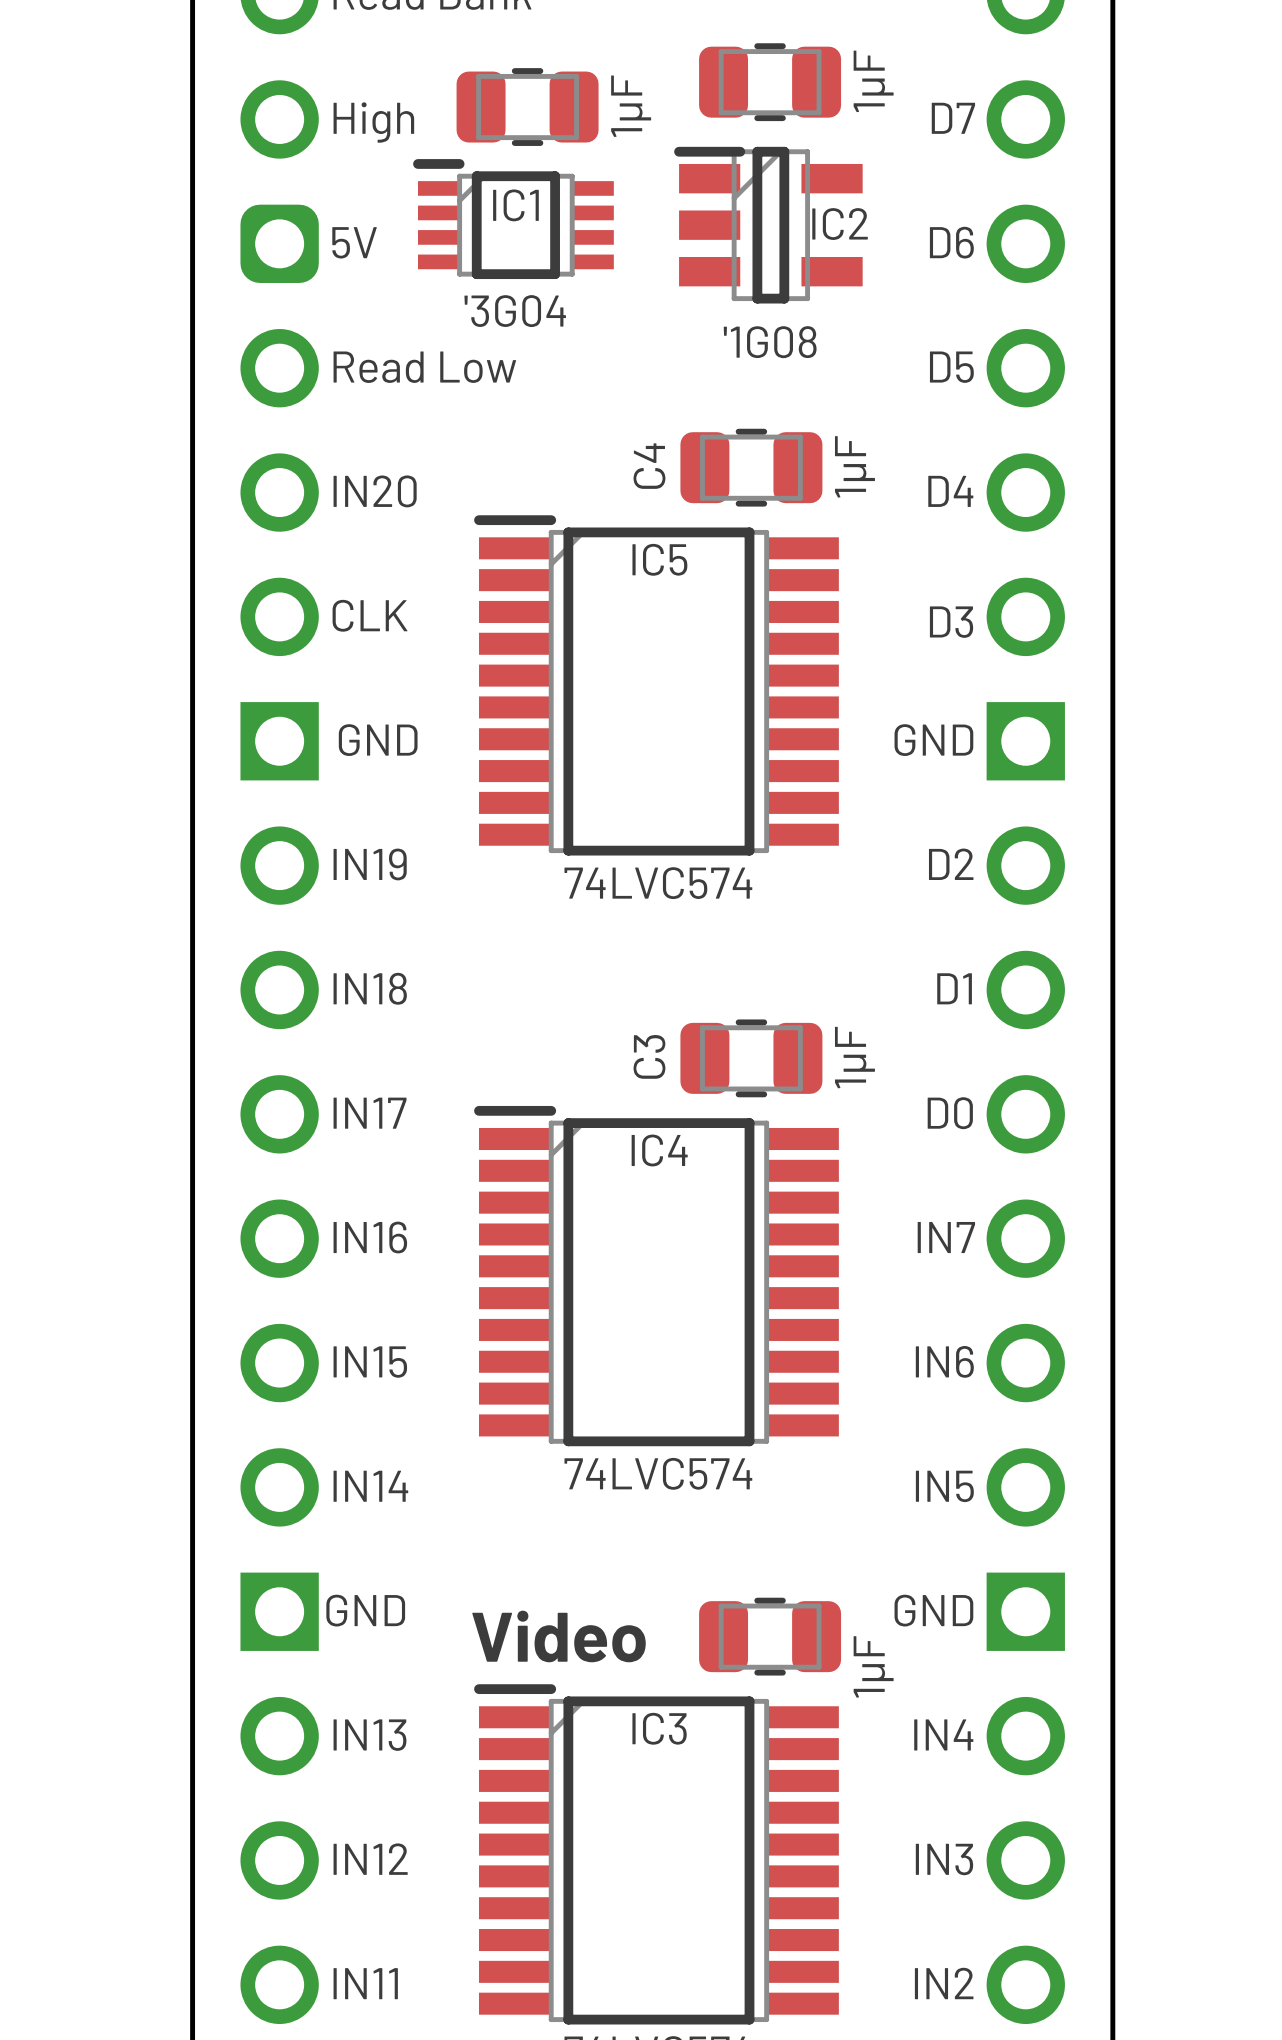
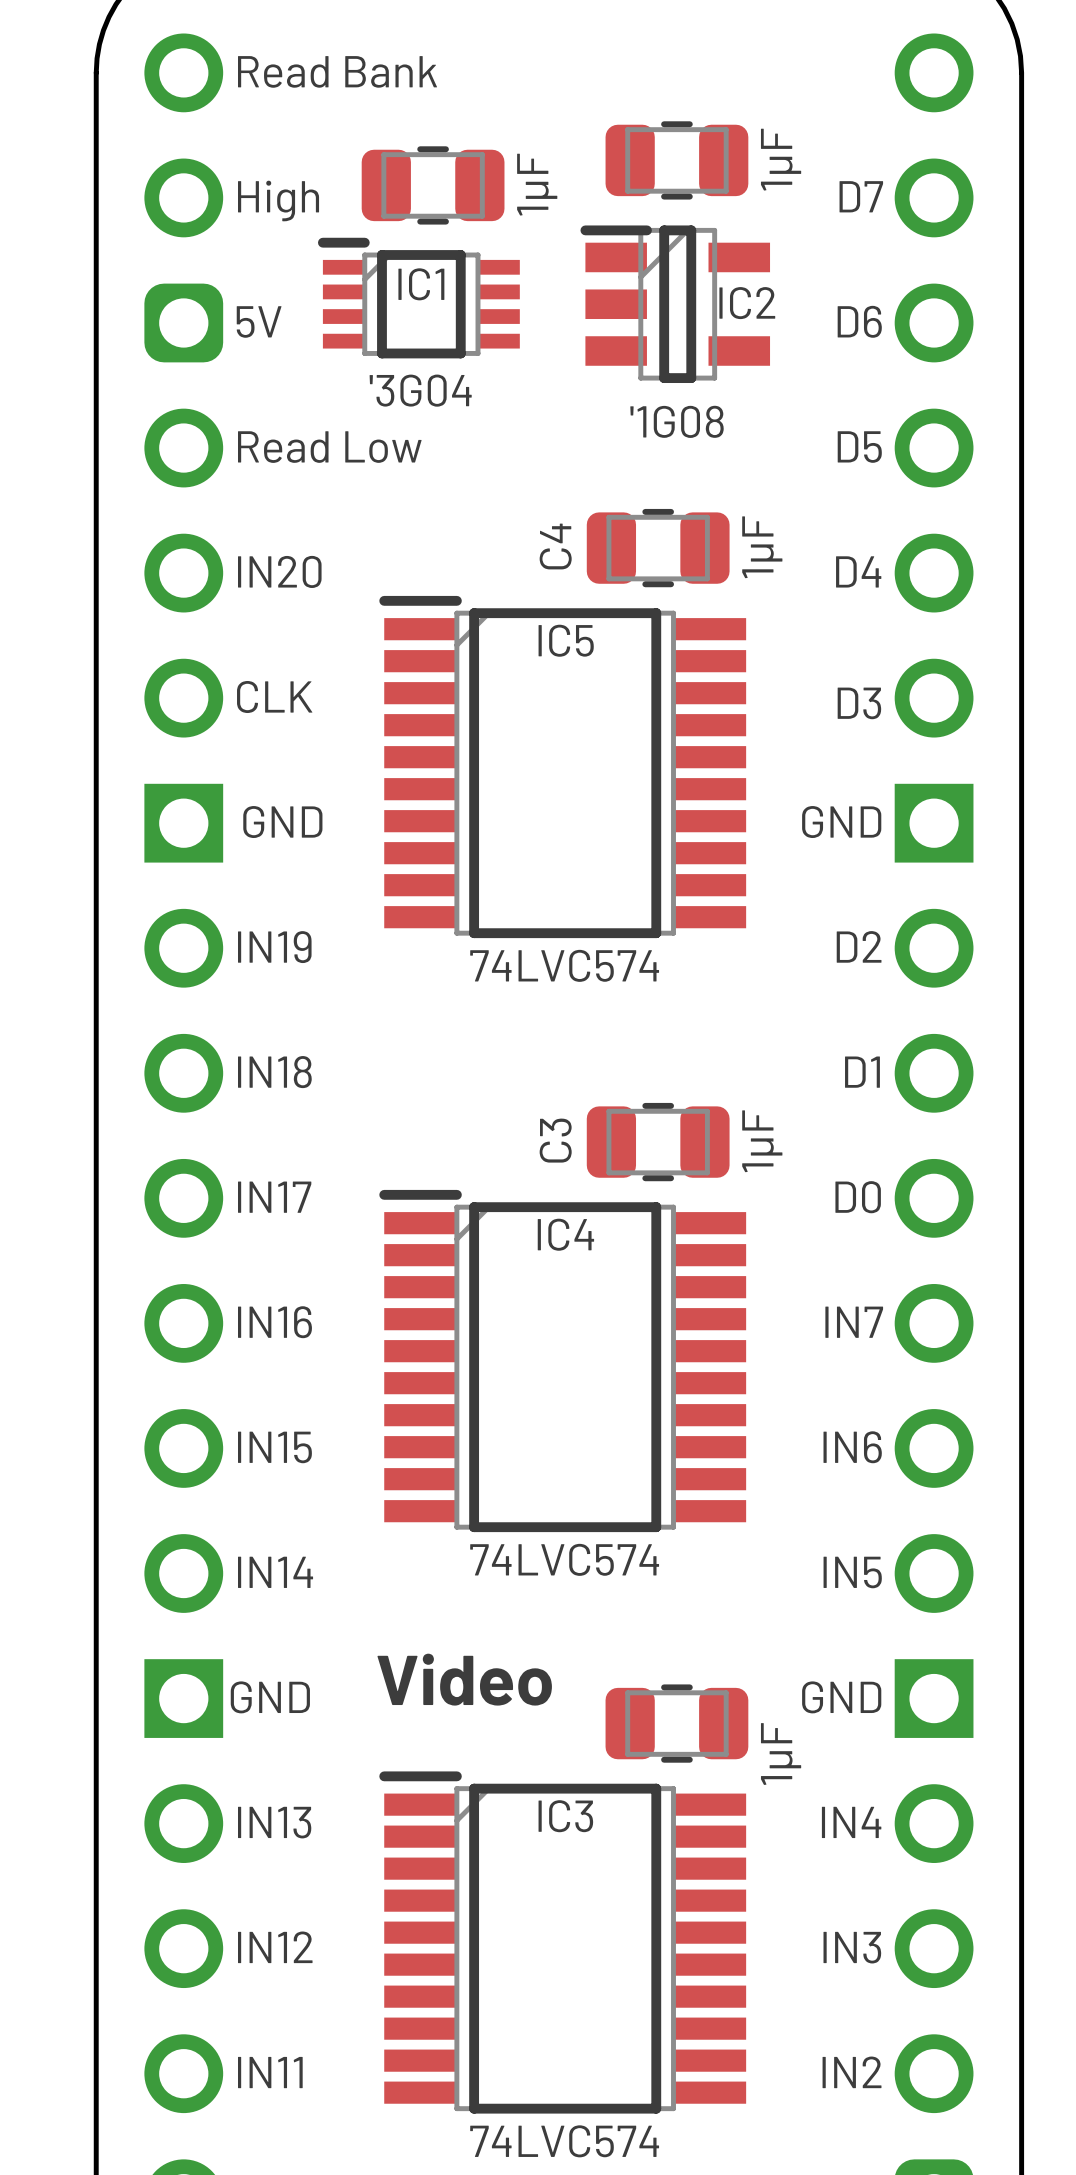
text position: Video (559, 1636) -> Video (464, 1679)

